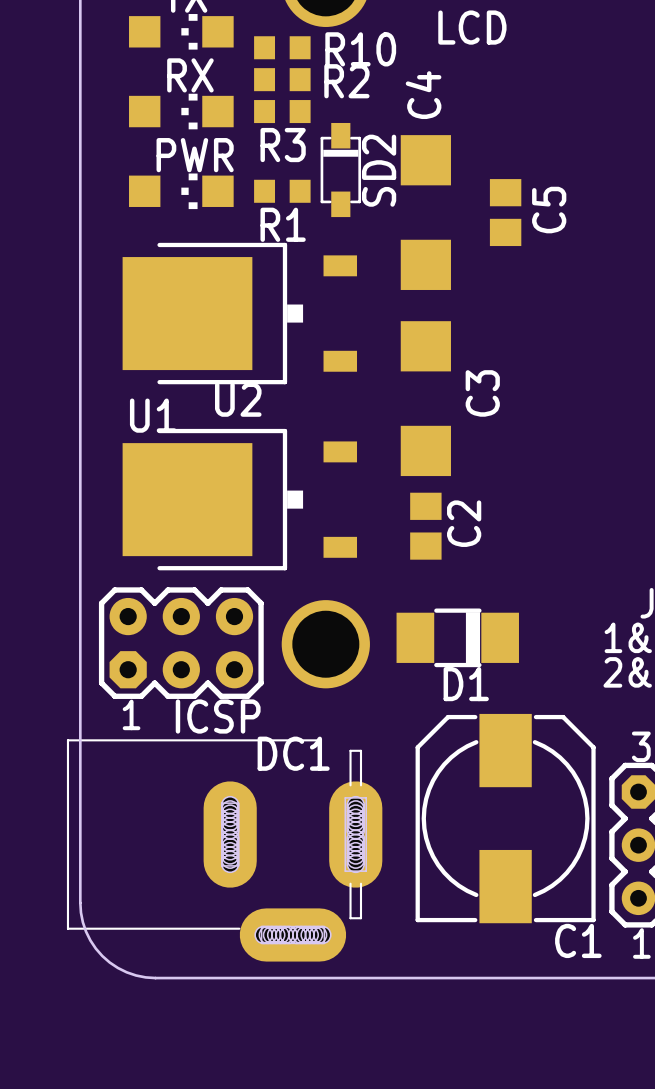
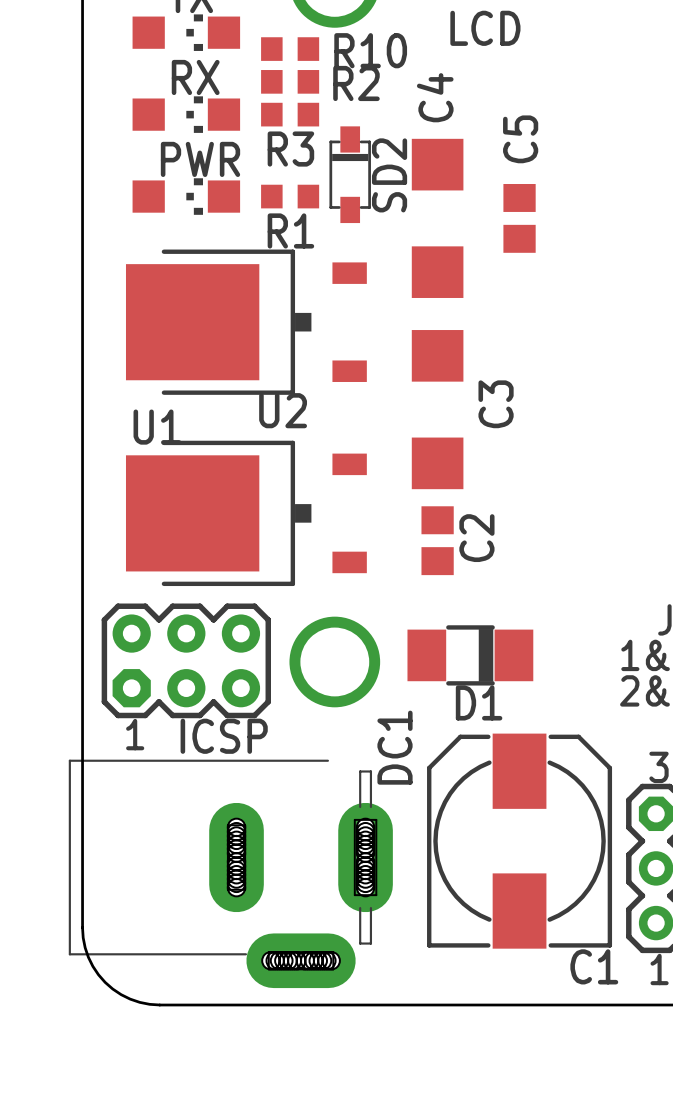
C5 name position: C5 (549, 210) -> C5 (520, 139)
U2 name position: U2 (238, 399) -> U2 (283, 410)
DC1 name rotation: 0° (293, 753) -> 90° counterclockwise (394, 747)
DC1 name position: DC1 (293, 753) -> DC1 (394, 747)

